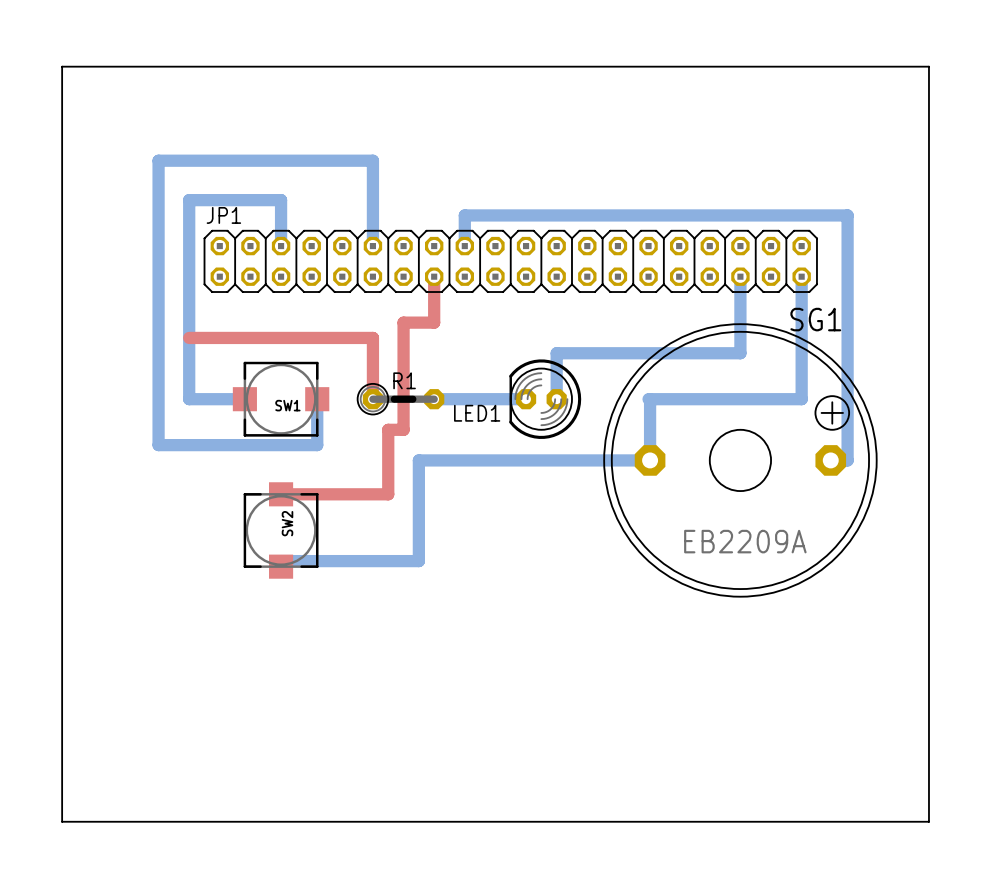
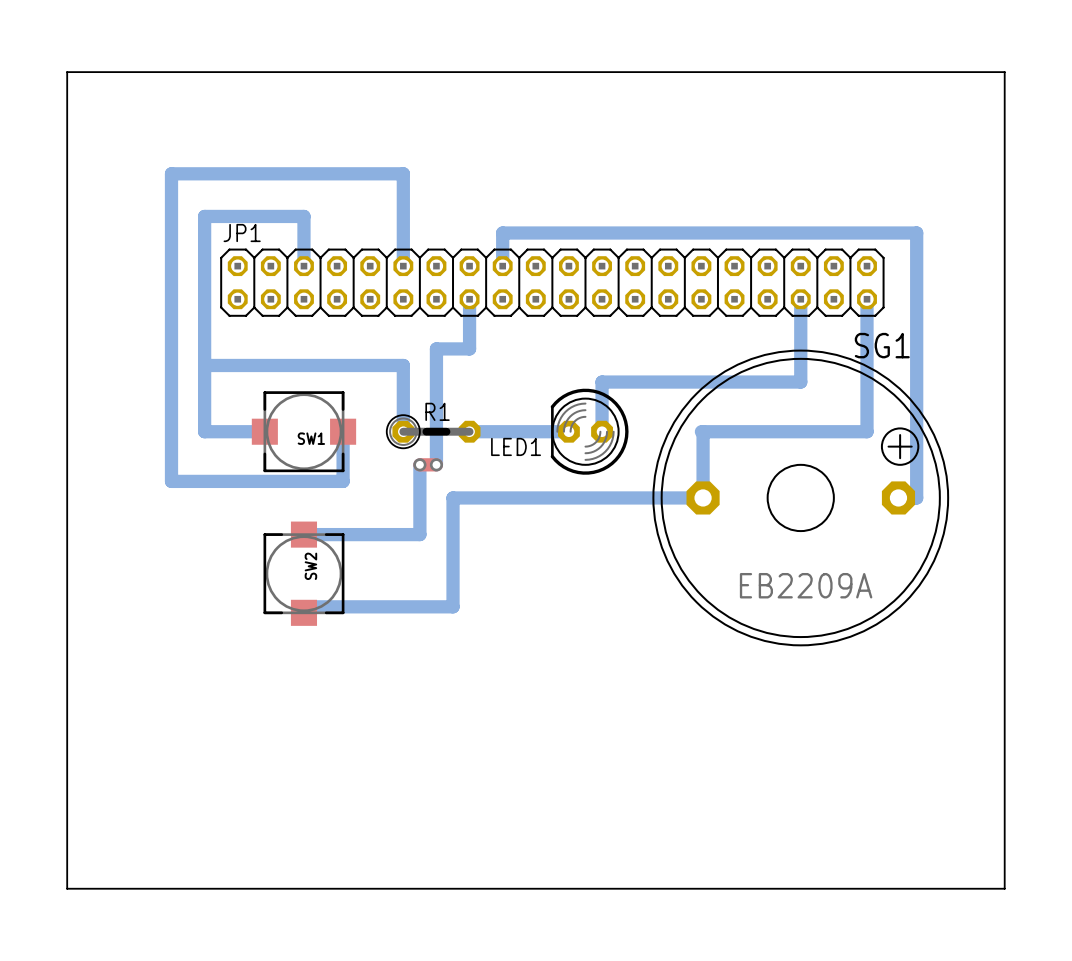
bottom track: none -> (469, 299) (469, 348) (436, 348) (436, 464)
top track: (434, 276) (434, 322) (403, 322) (403, 429) -> none
bottom track: none -> (204, 365) (403, 365) (403, 431)
top track: (189, 337) (372, 337) (372, 399) -> none
bottom track: none -> (419, 464) (419, 534) (303, 534)
top track: (388, 429) (388, 494) (281, 494) -> none
via: none -> (419, 464)
via: none -> (436, 464)

